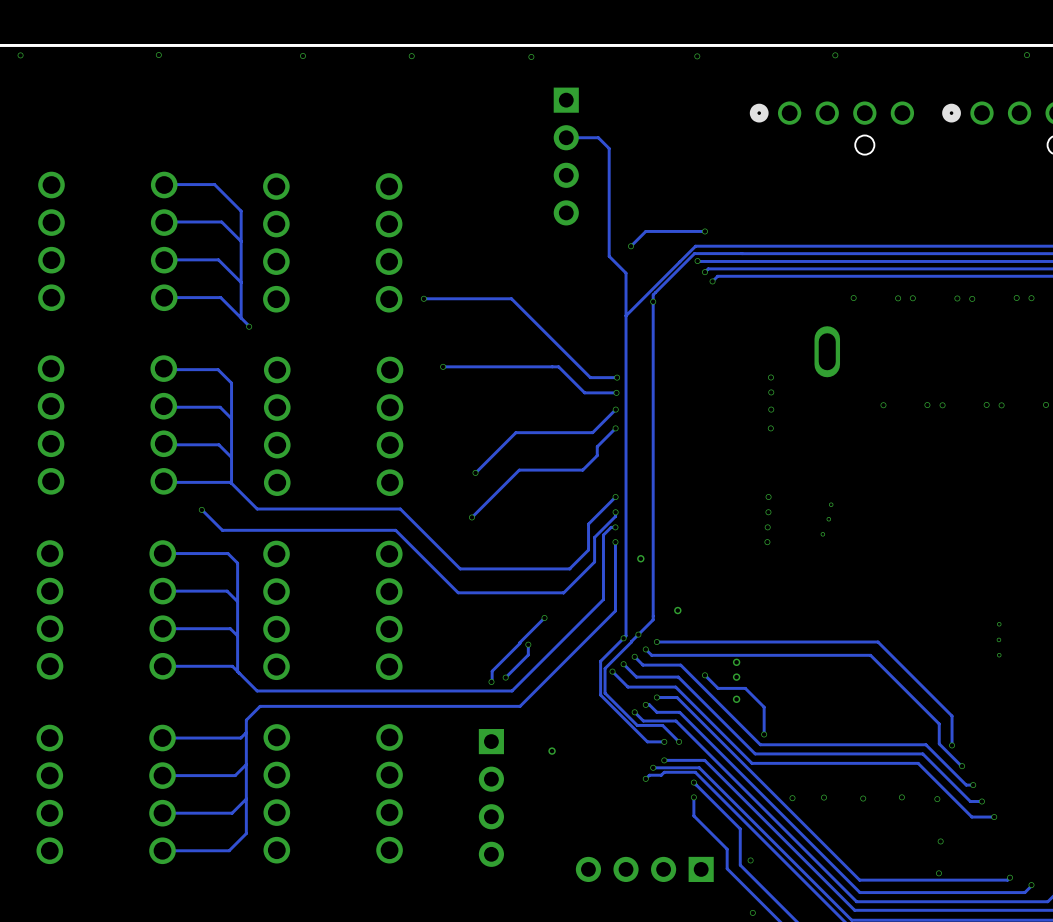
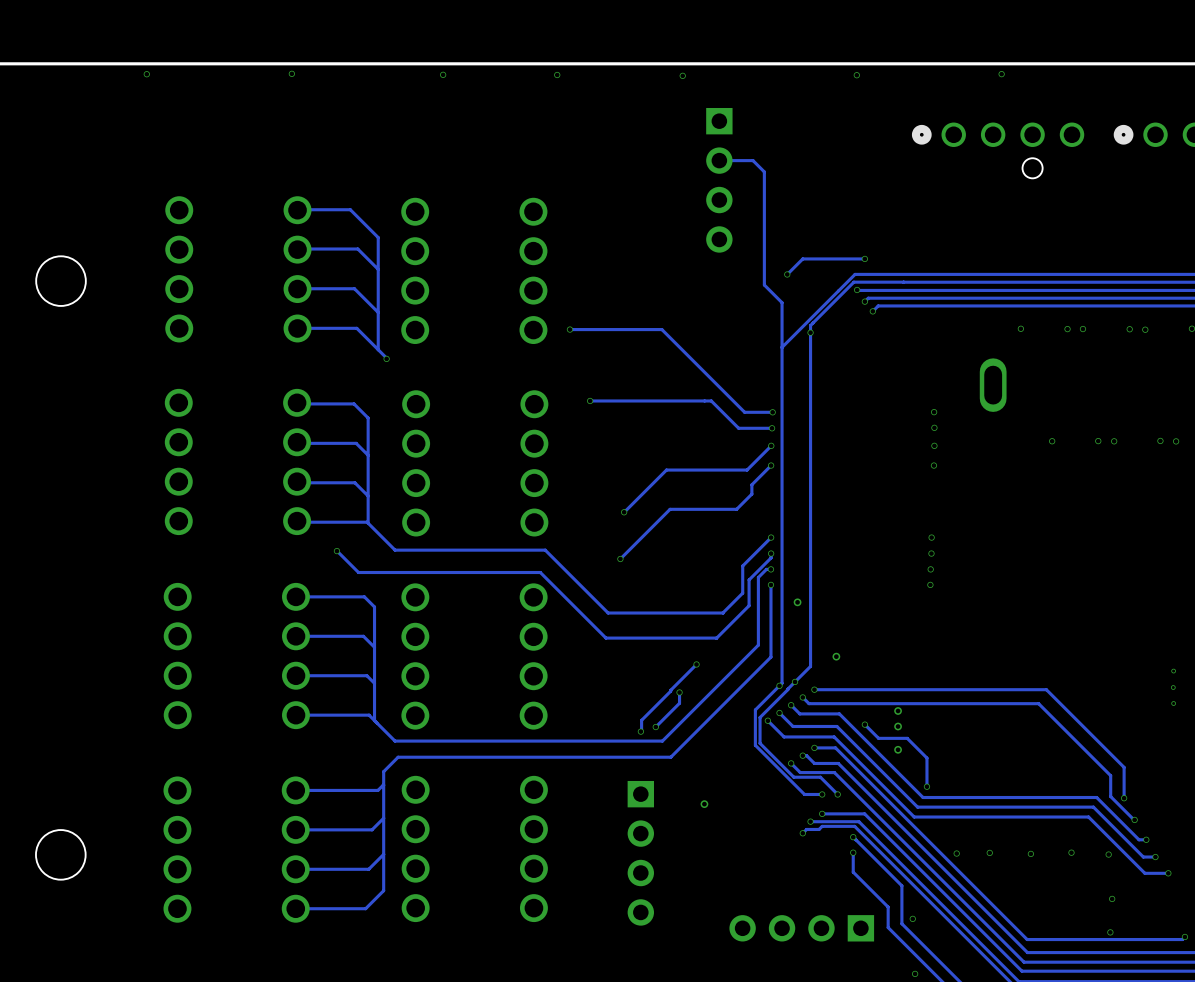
via: (831, 504) -> none
via: (828, 519) -> none
via: (822, 534) -> none

